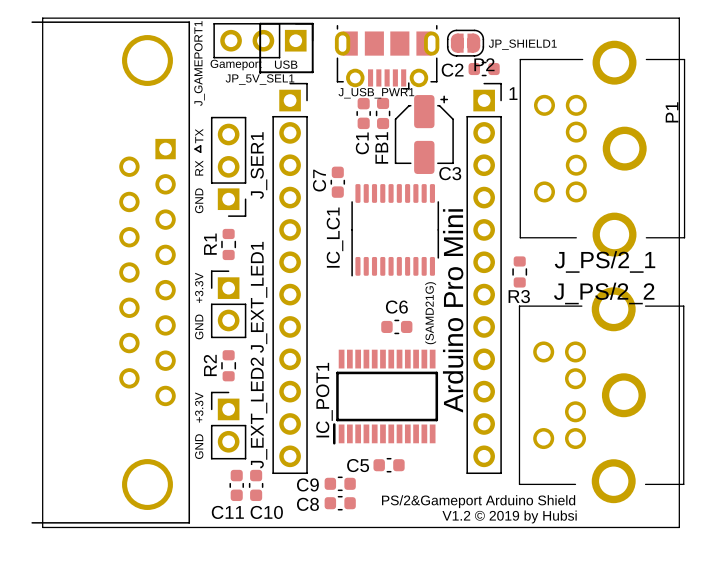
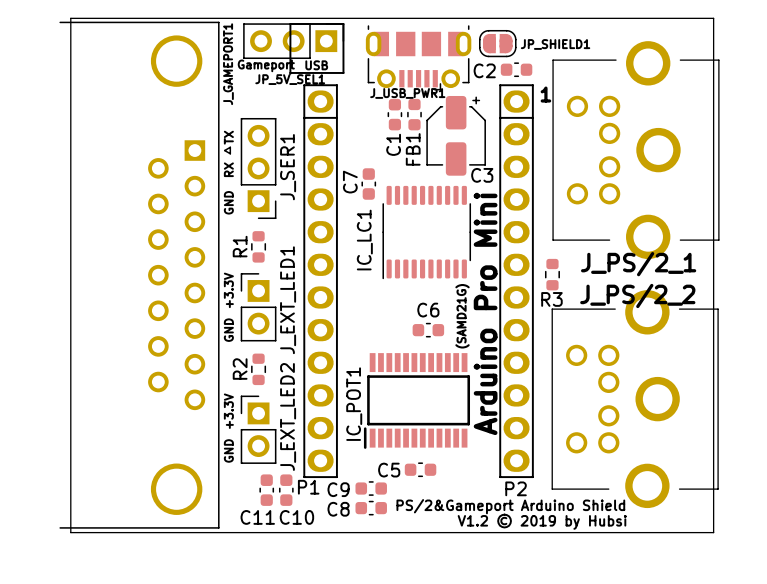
P2 name position: P2 (484, 64) -> P2 (516, 488)
P1 footprint: [272, 82, 308, 475] -> [303, 84, 338, 479]
P2 footprint: [466, 82, 502, 475] -> [499, 84, 534, 479]
P1 name position: P1 (672, 112) -> P1 (308, 487)

